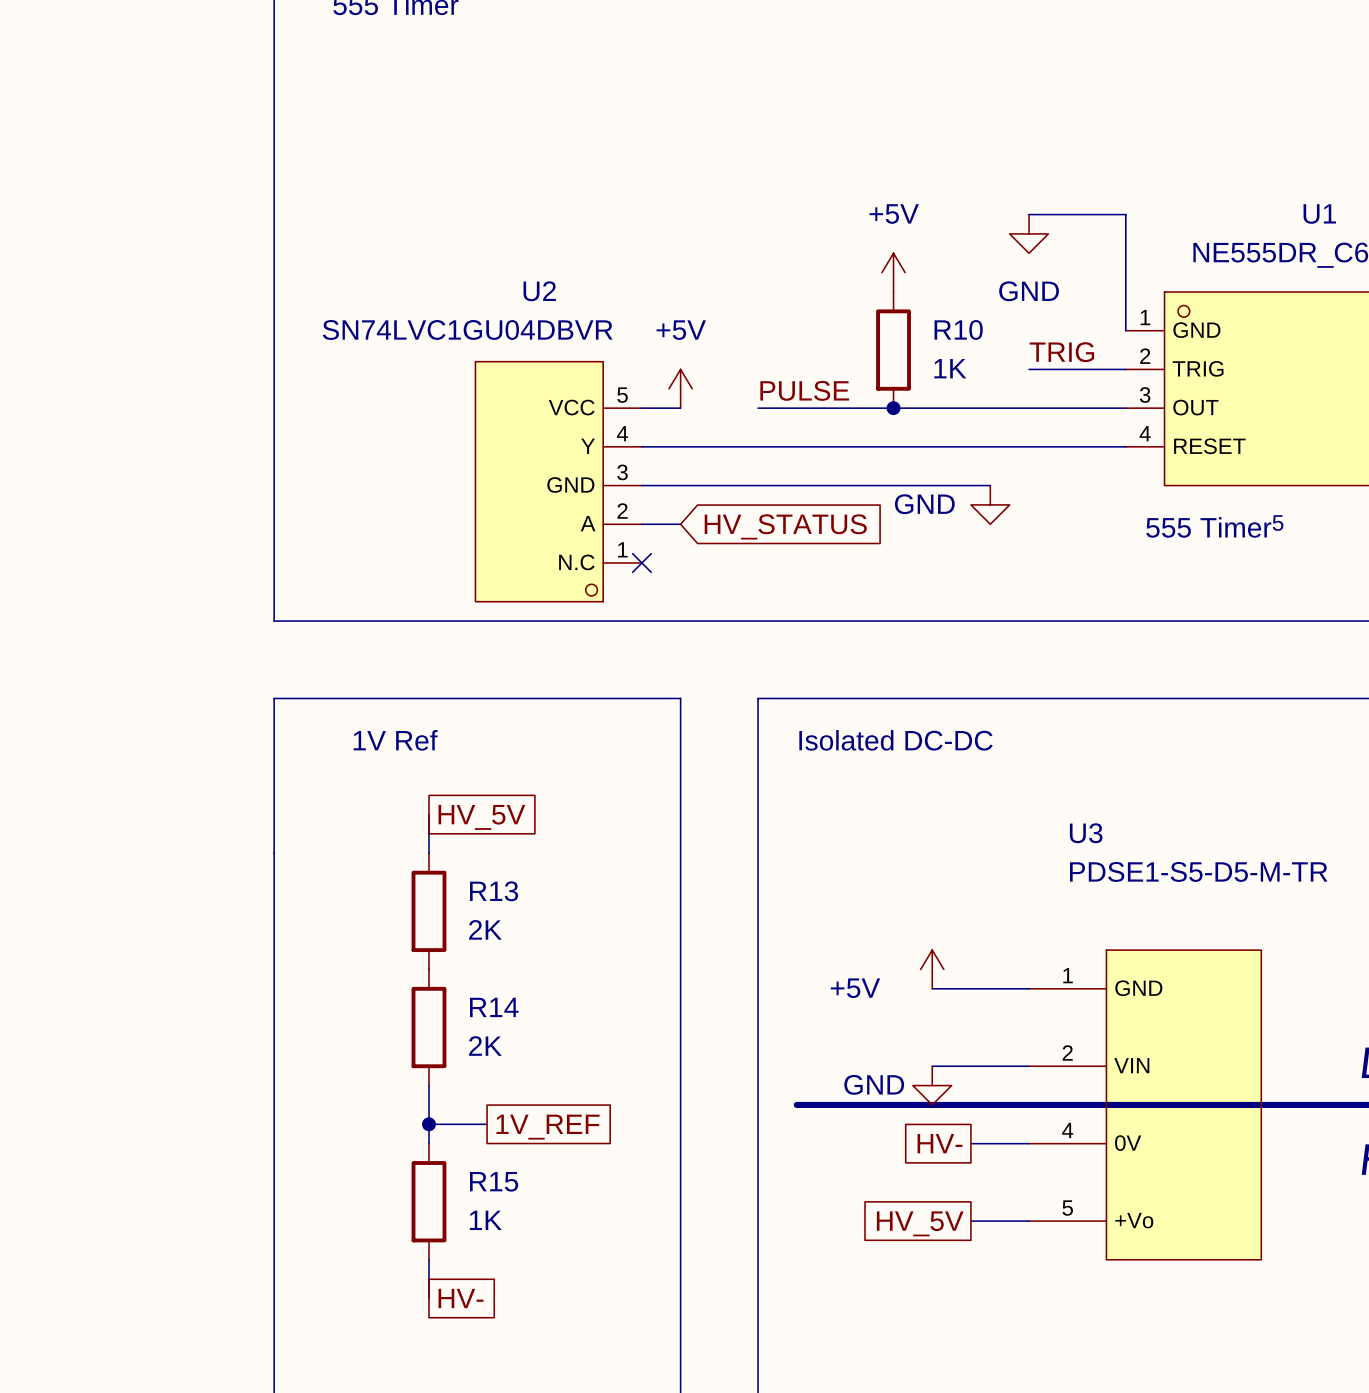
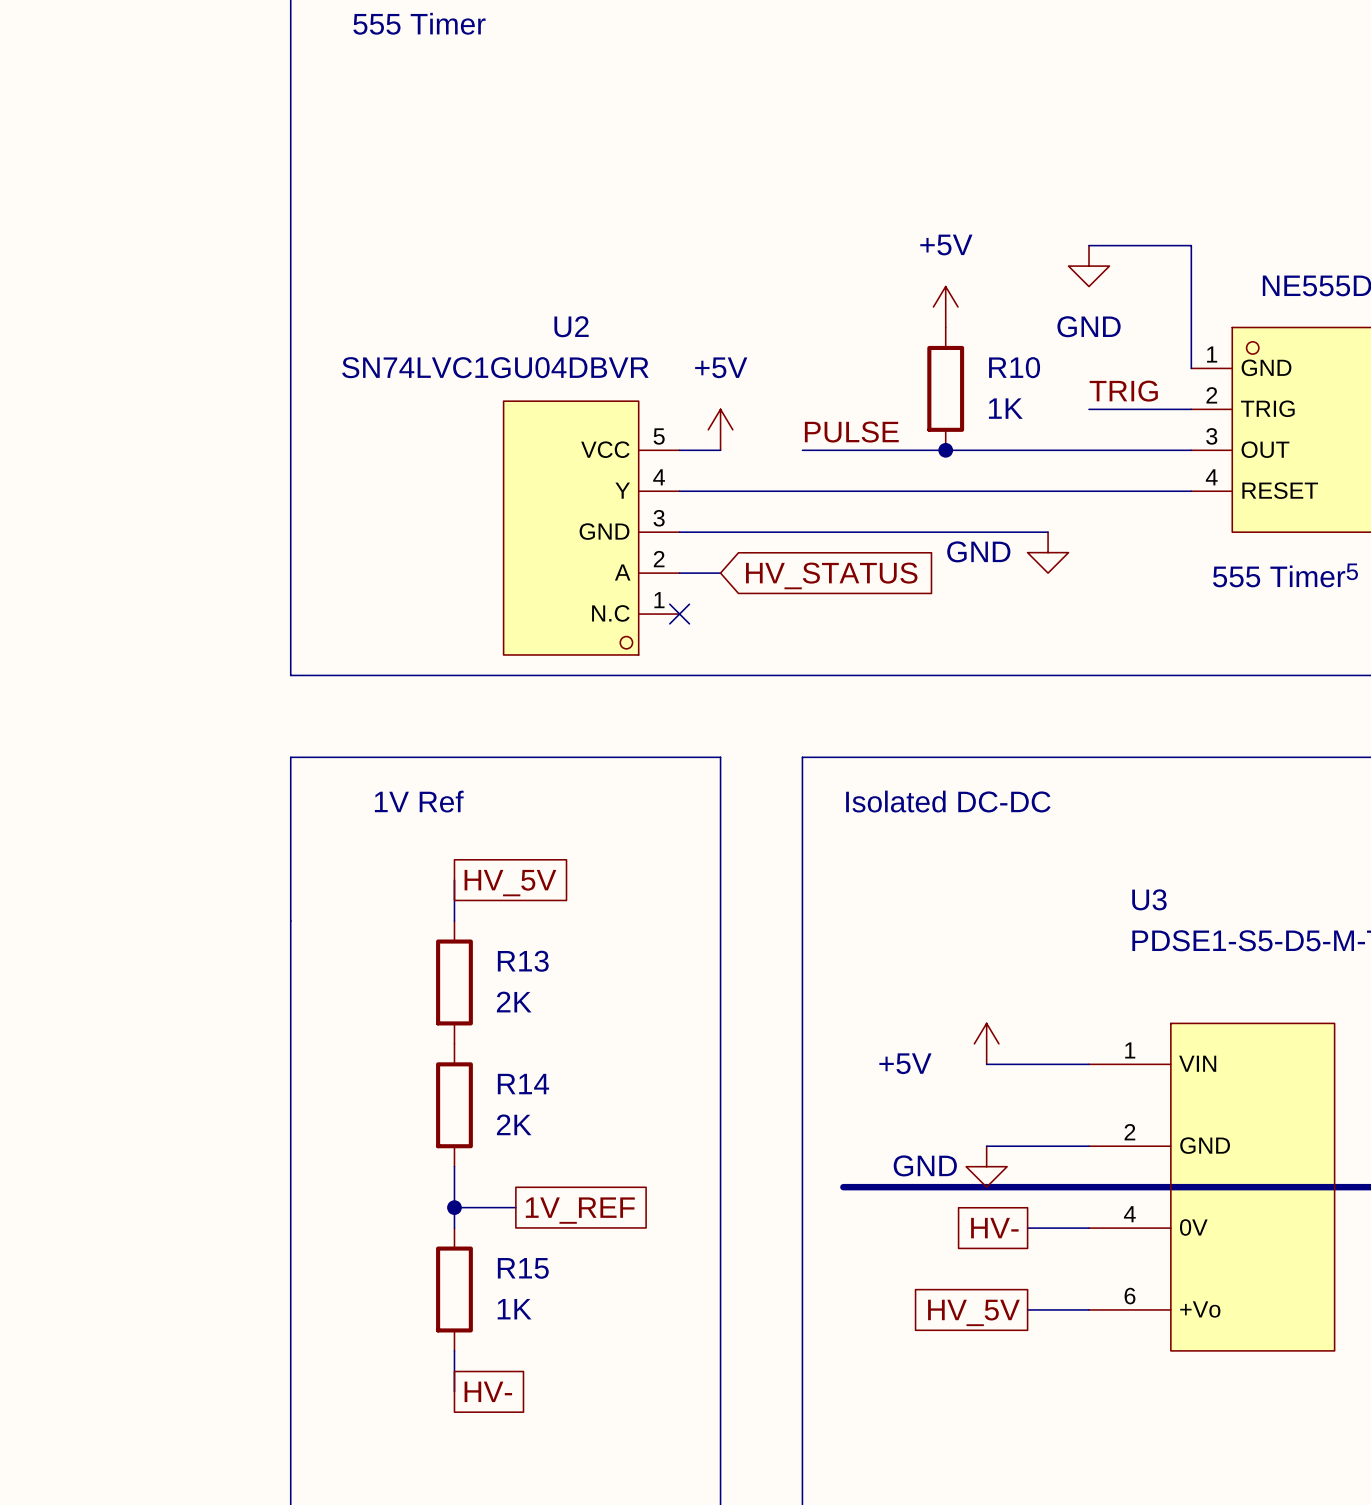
U3 pin name: GND (1138, 988) -> VIN (1197, 1063)
U3 pin name: VIN (1131, 1065) -> GND (1205, 1145)
U3 pin number: 5 (1067, 1208) -> 6 (1130, 1296)

